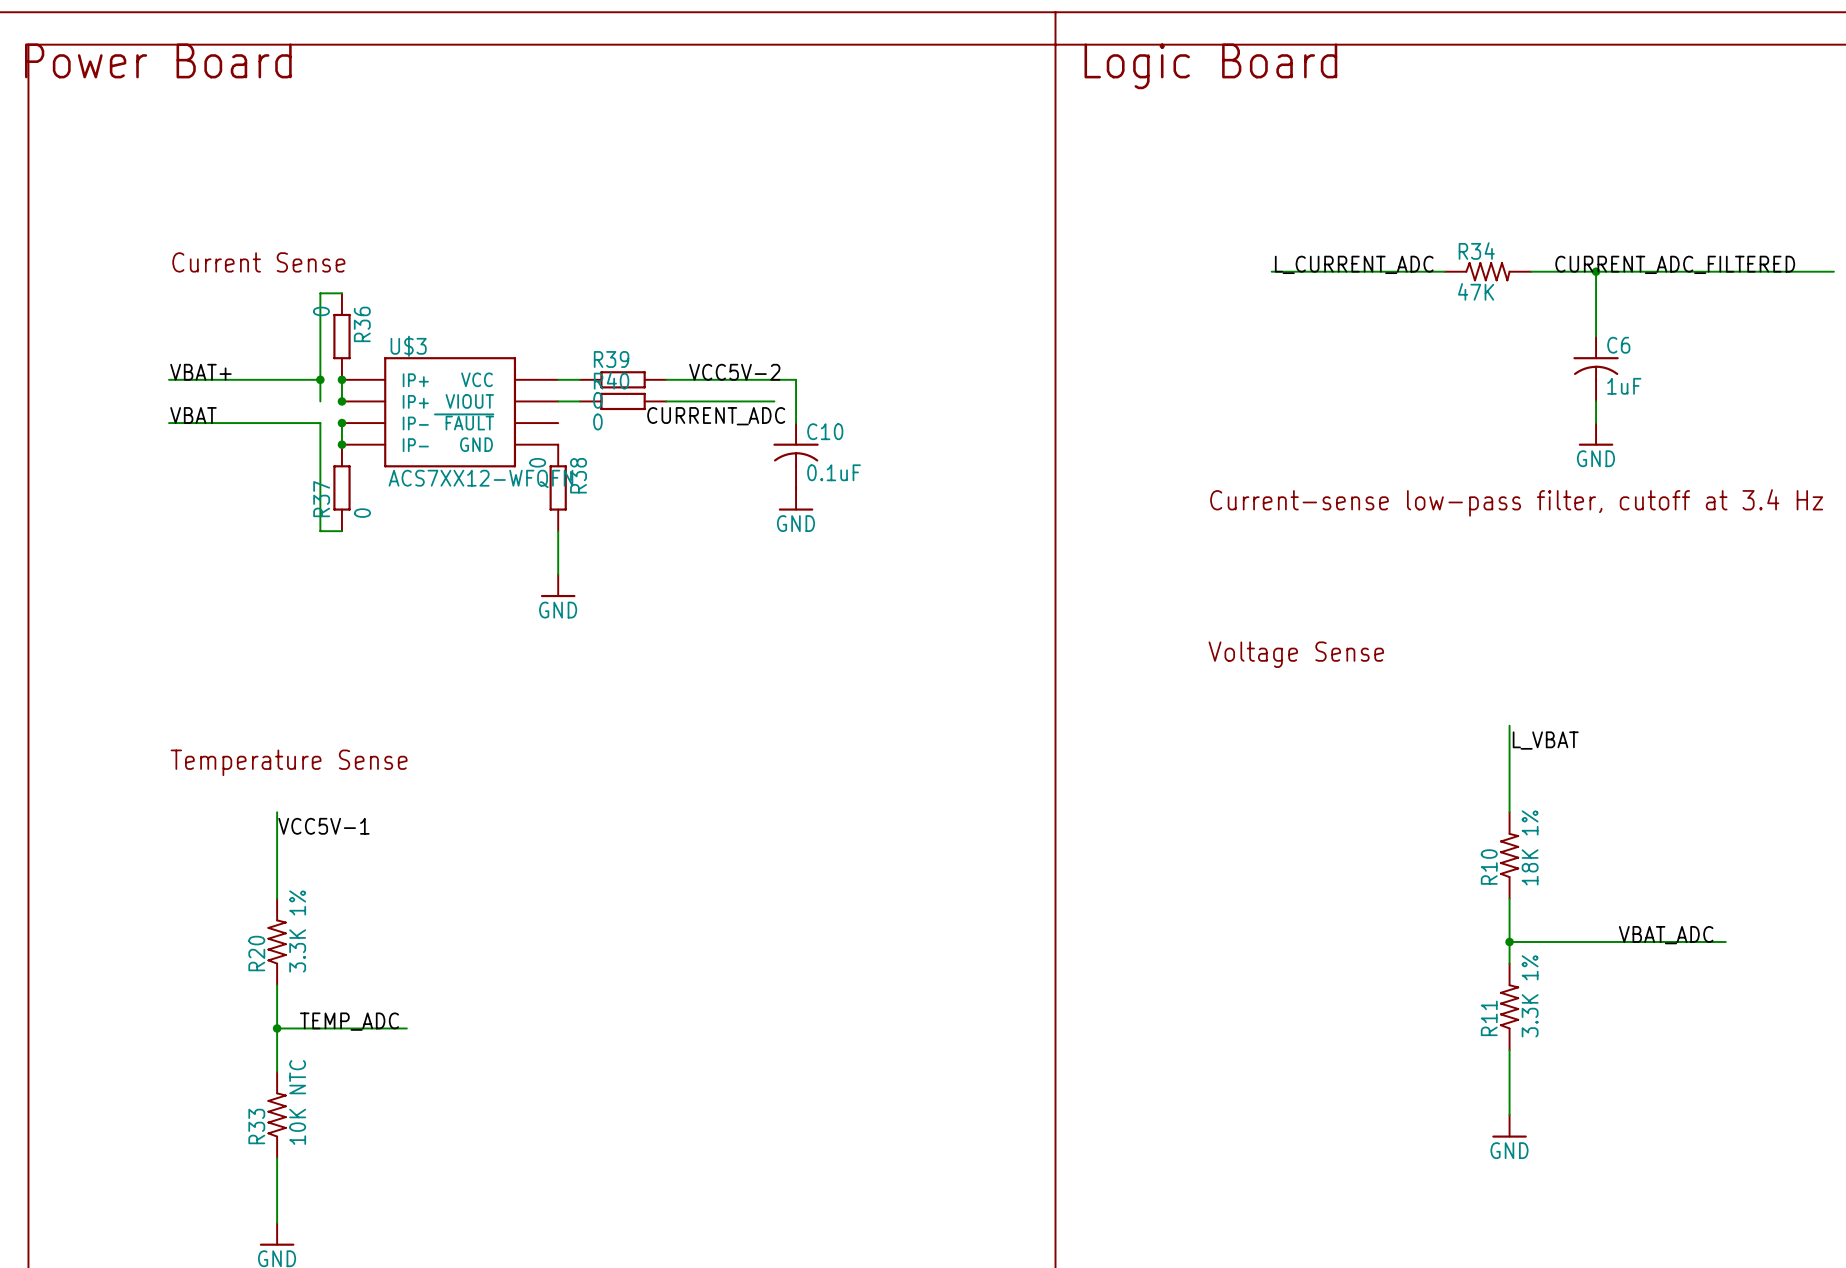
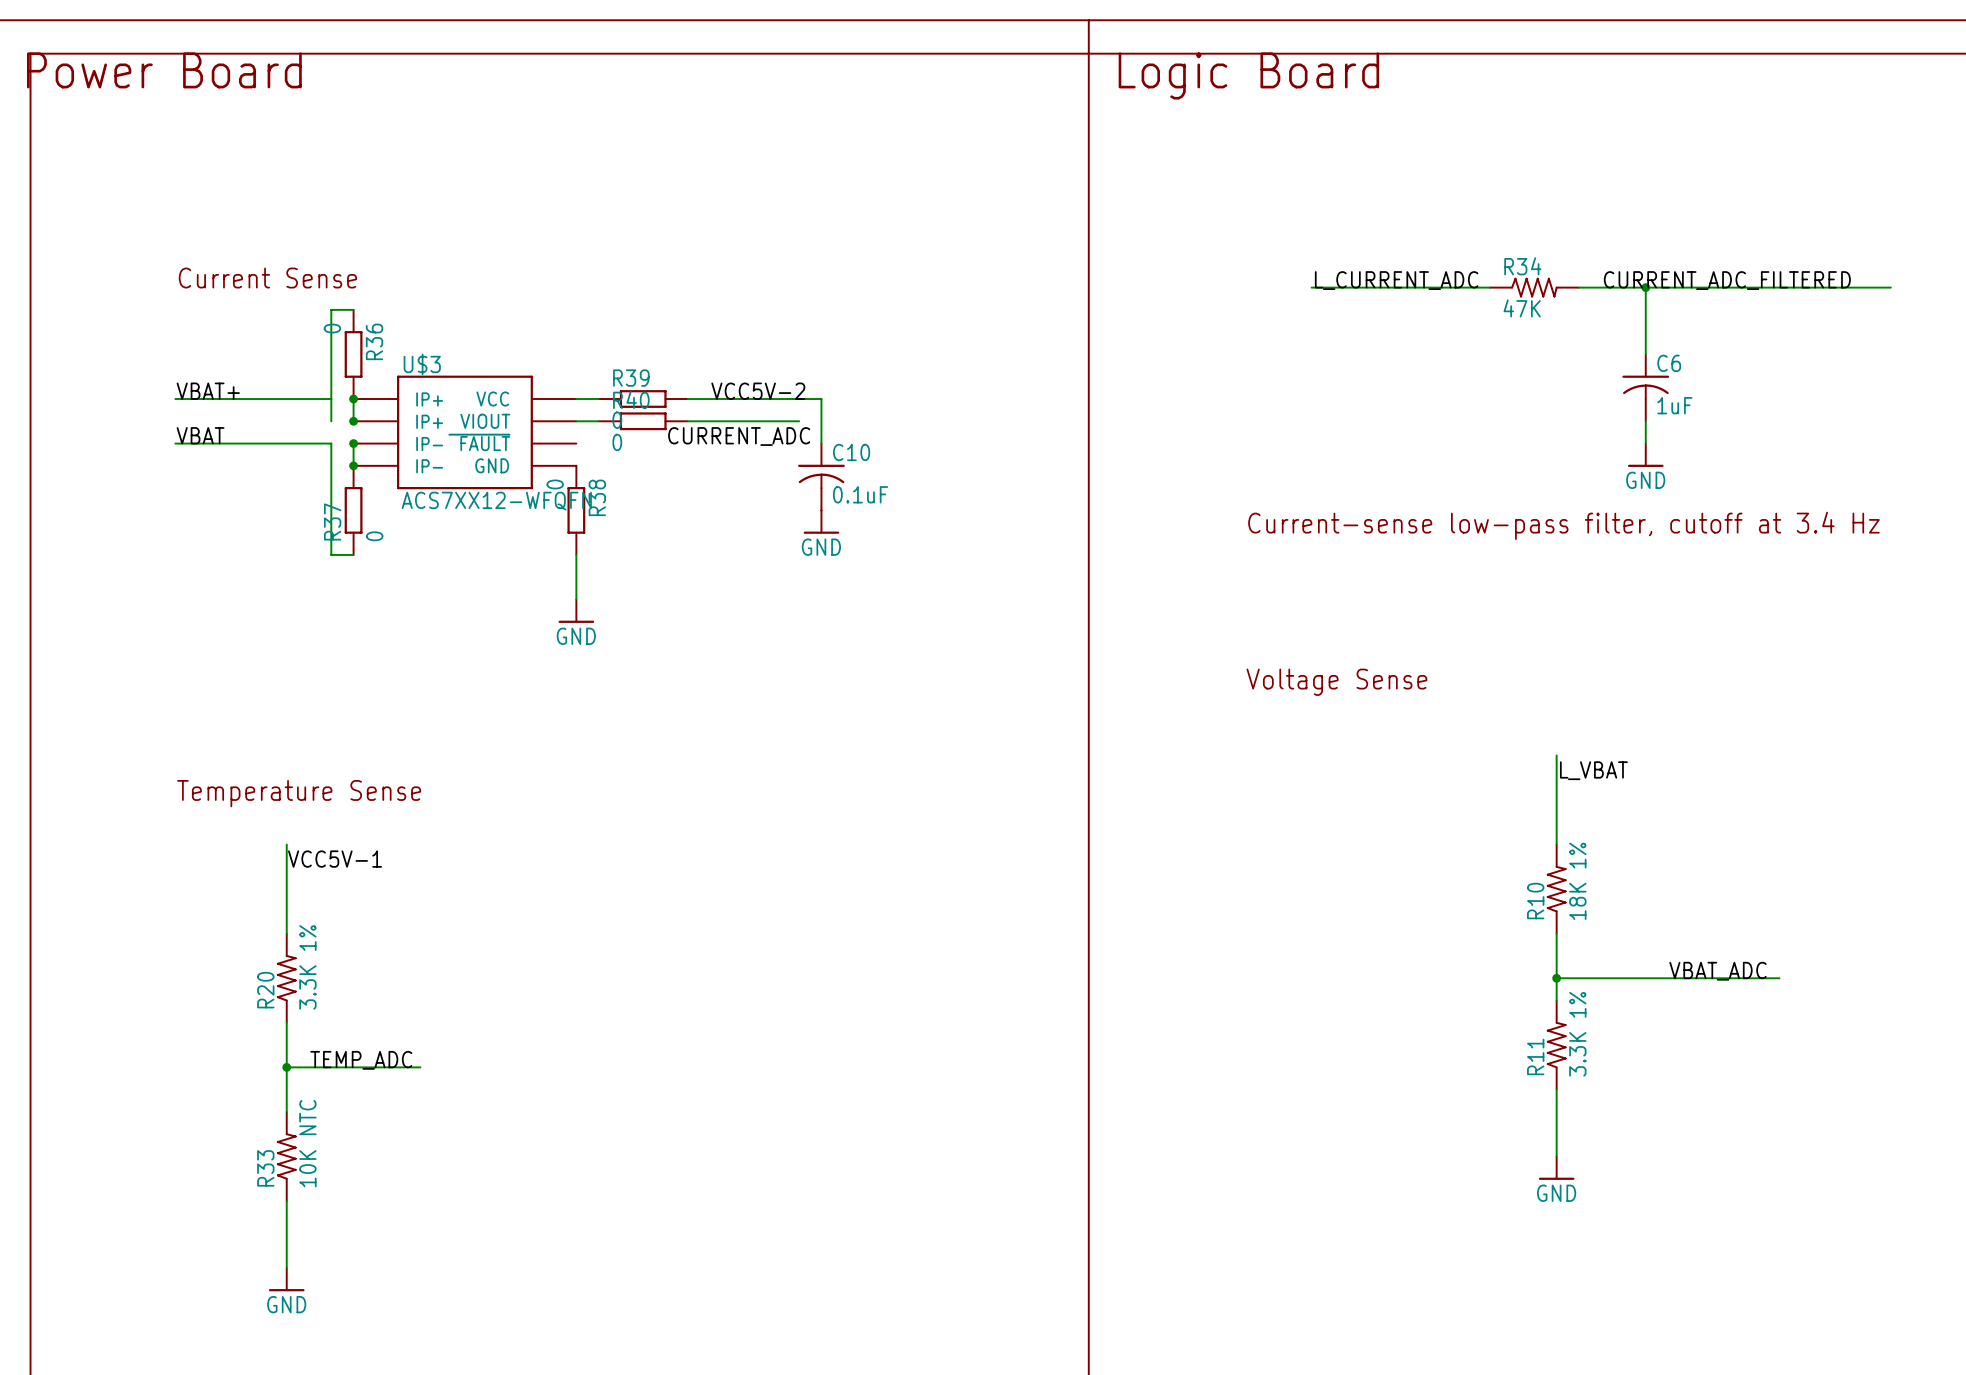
junction: (320, 379) -> none

